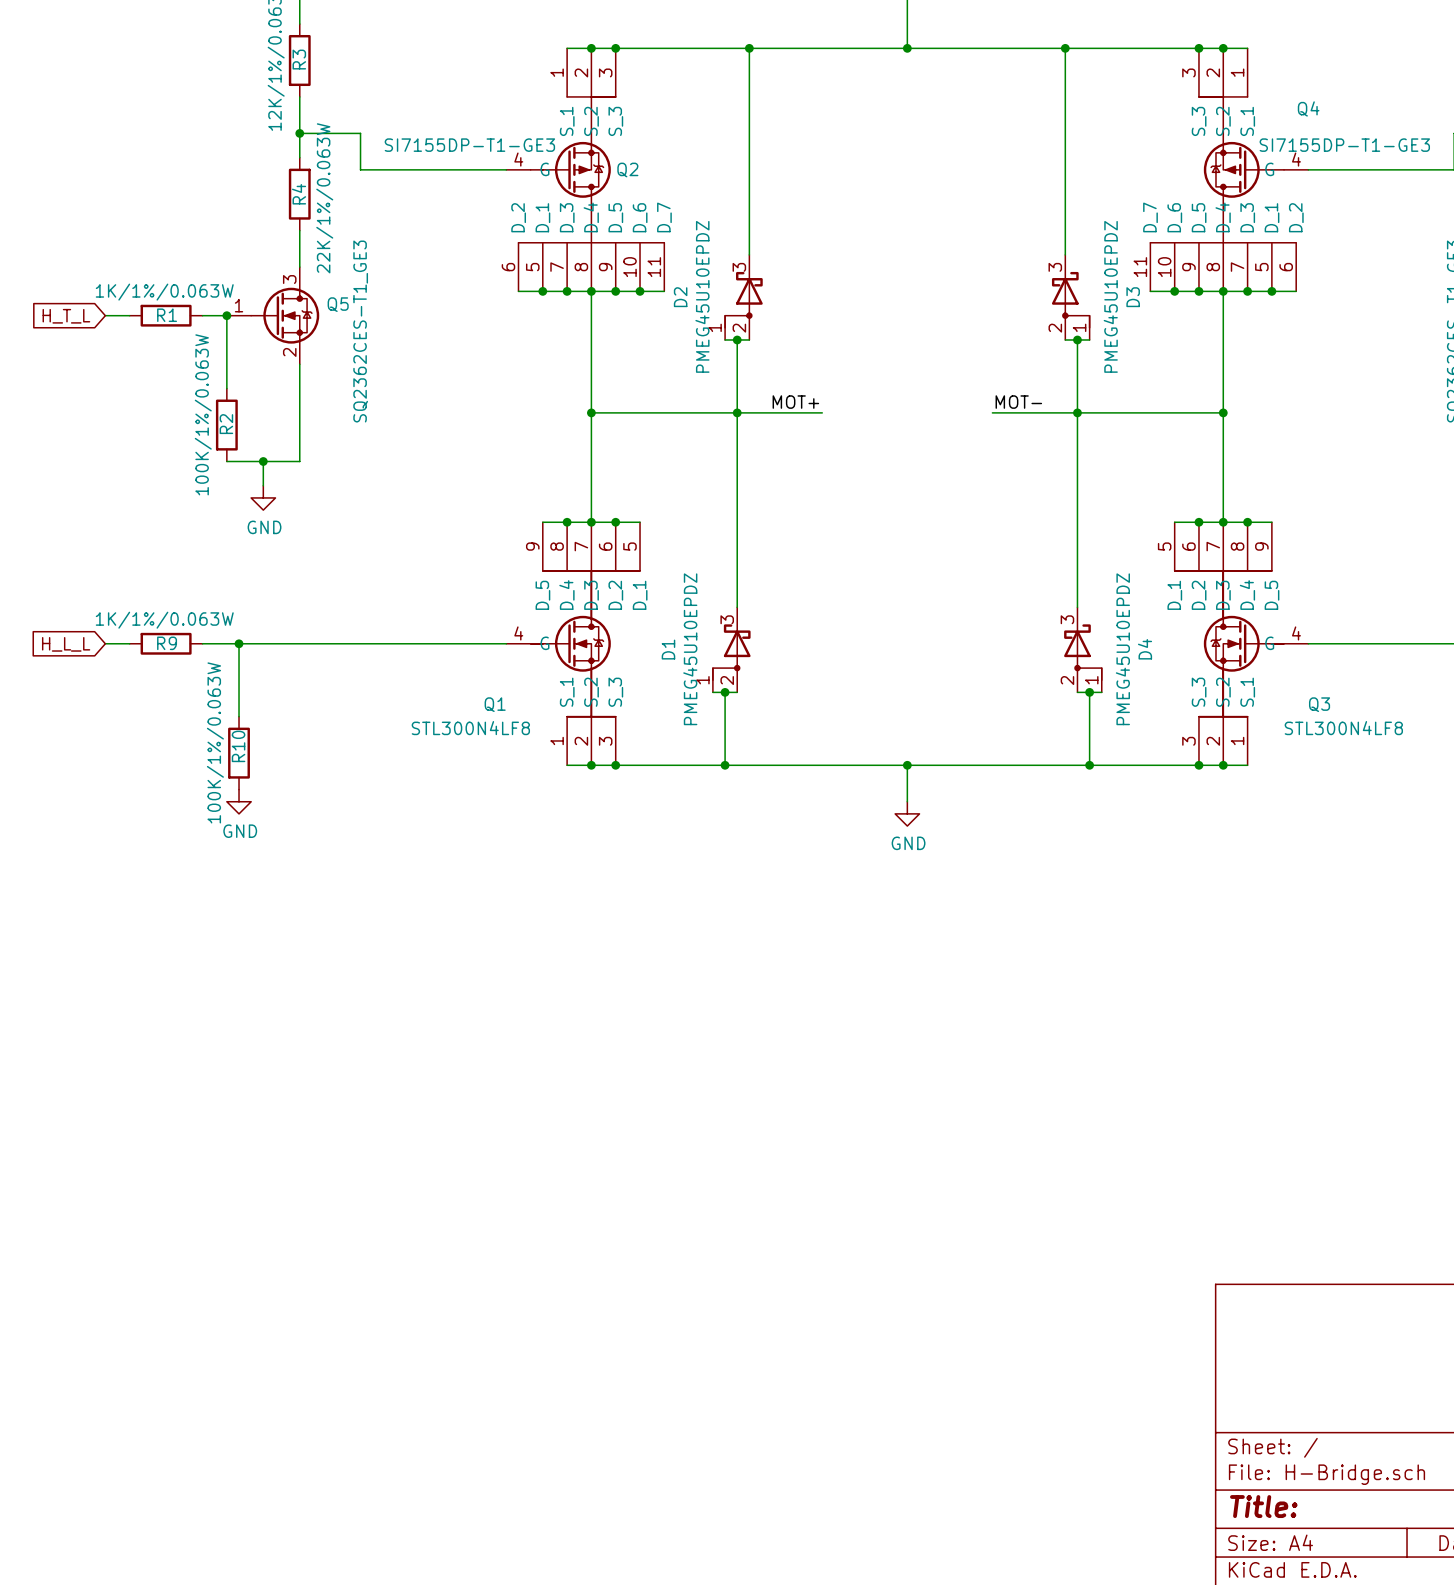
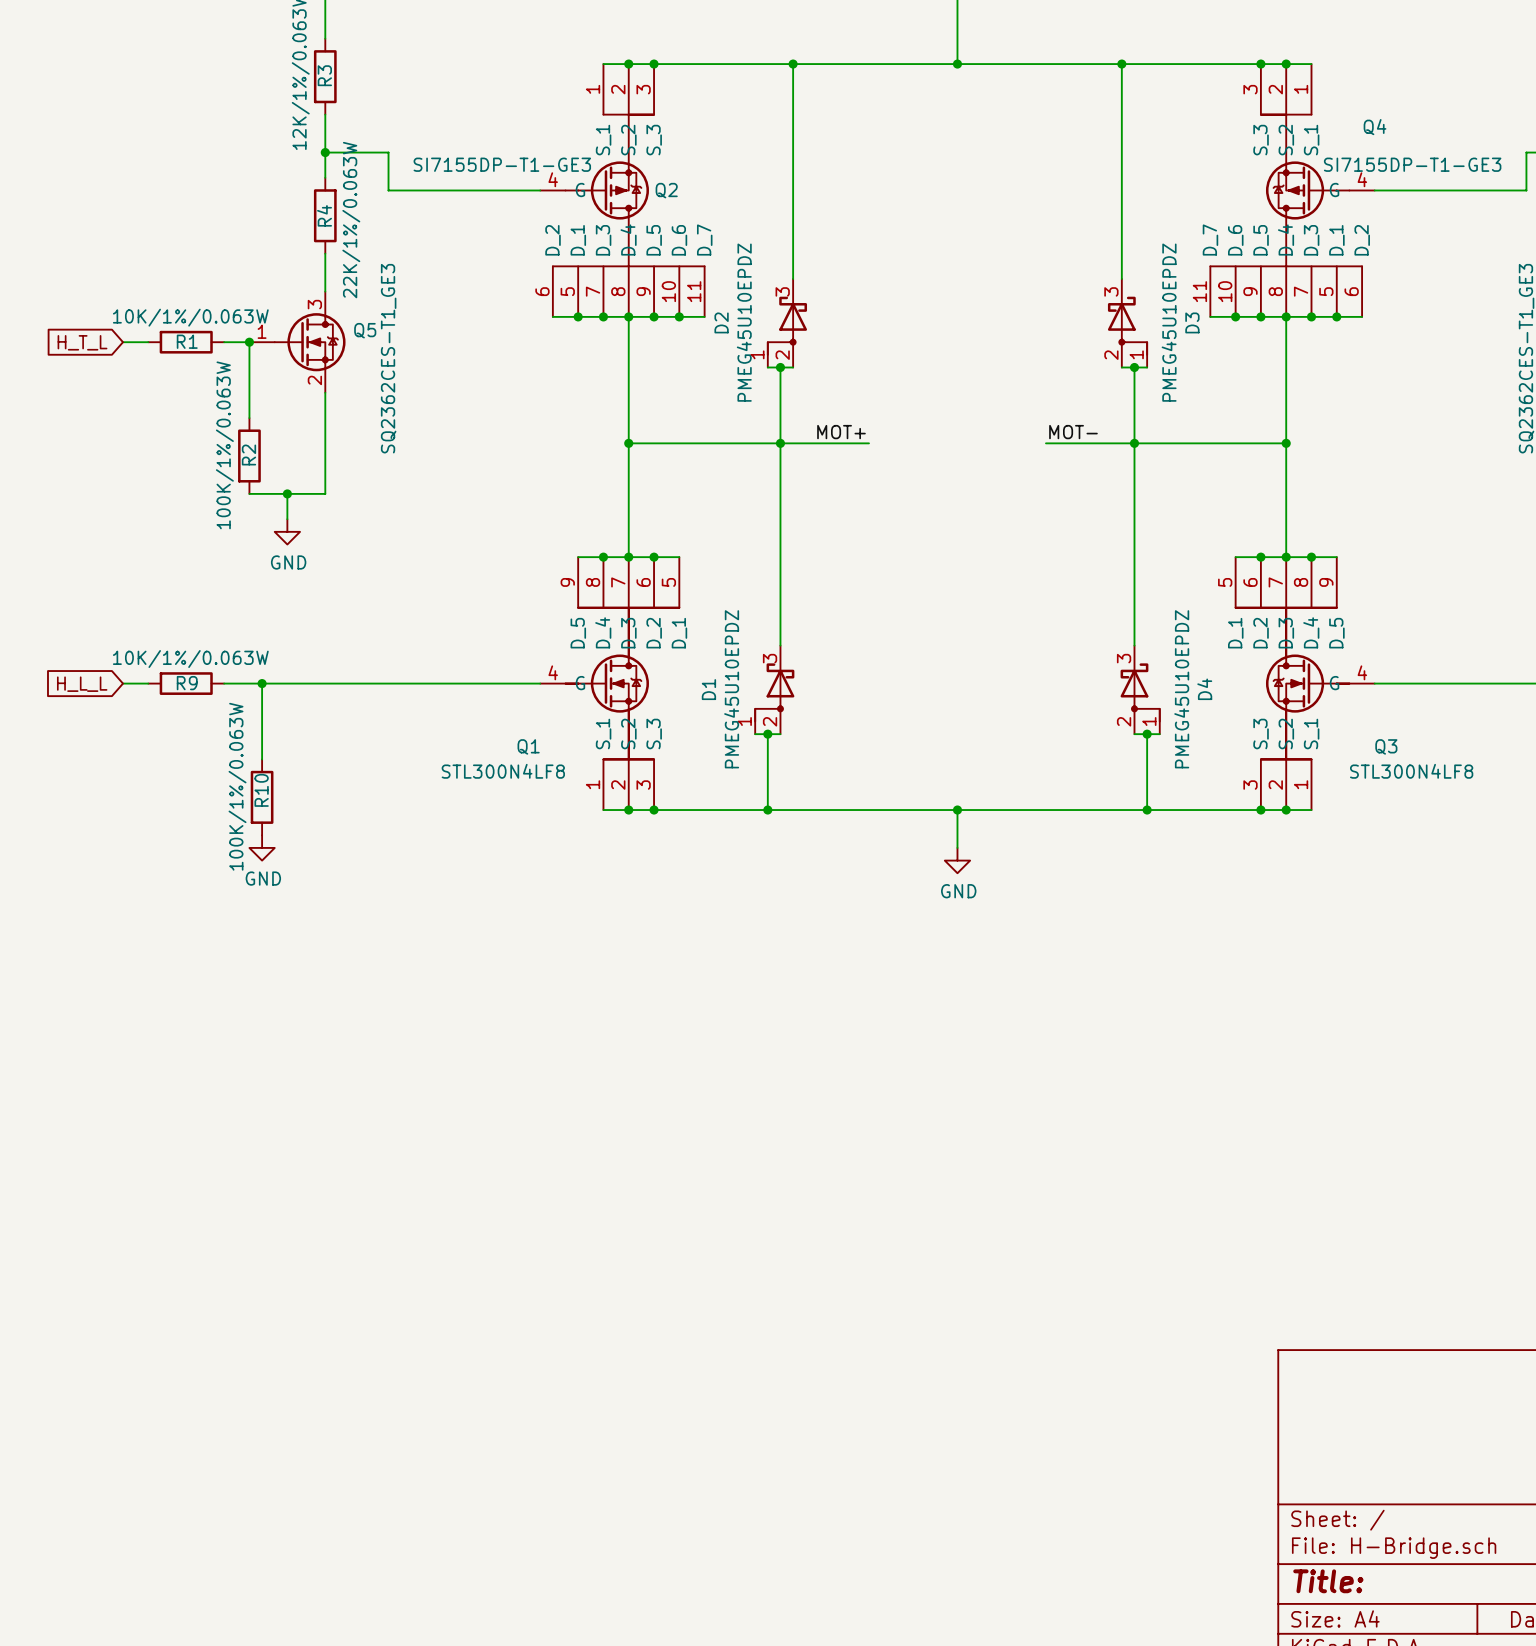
R1 value: 1K/1%/0.063W (164, 292) -> 10K/1%/0.063W (190, 317)
R9 value: 1K/1%/0.063W (164, 620) -> 10K/1%/0.063W (190, 659)

